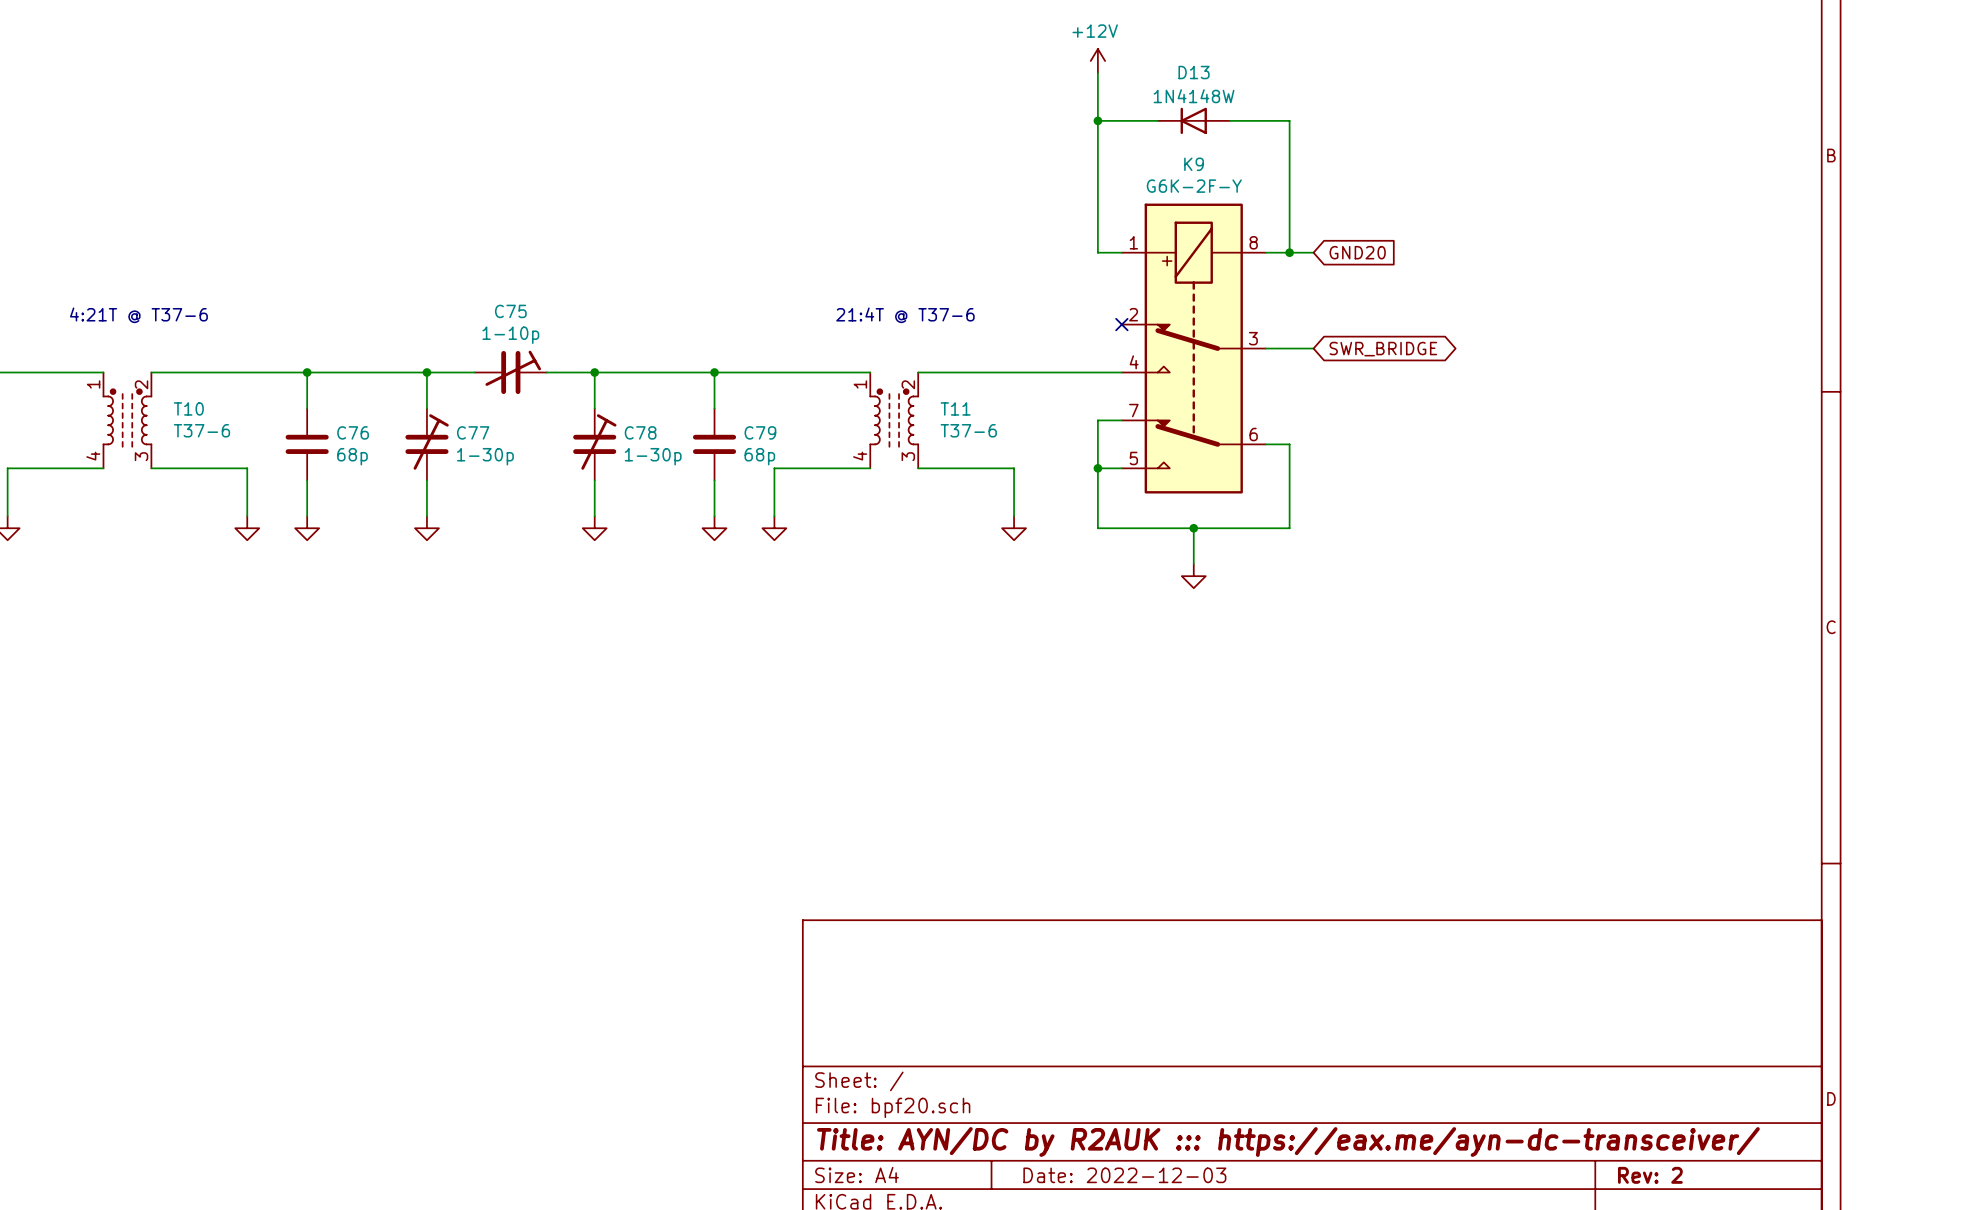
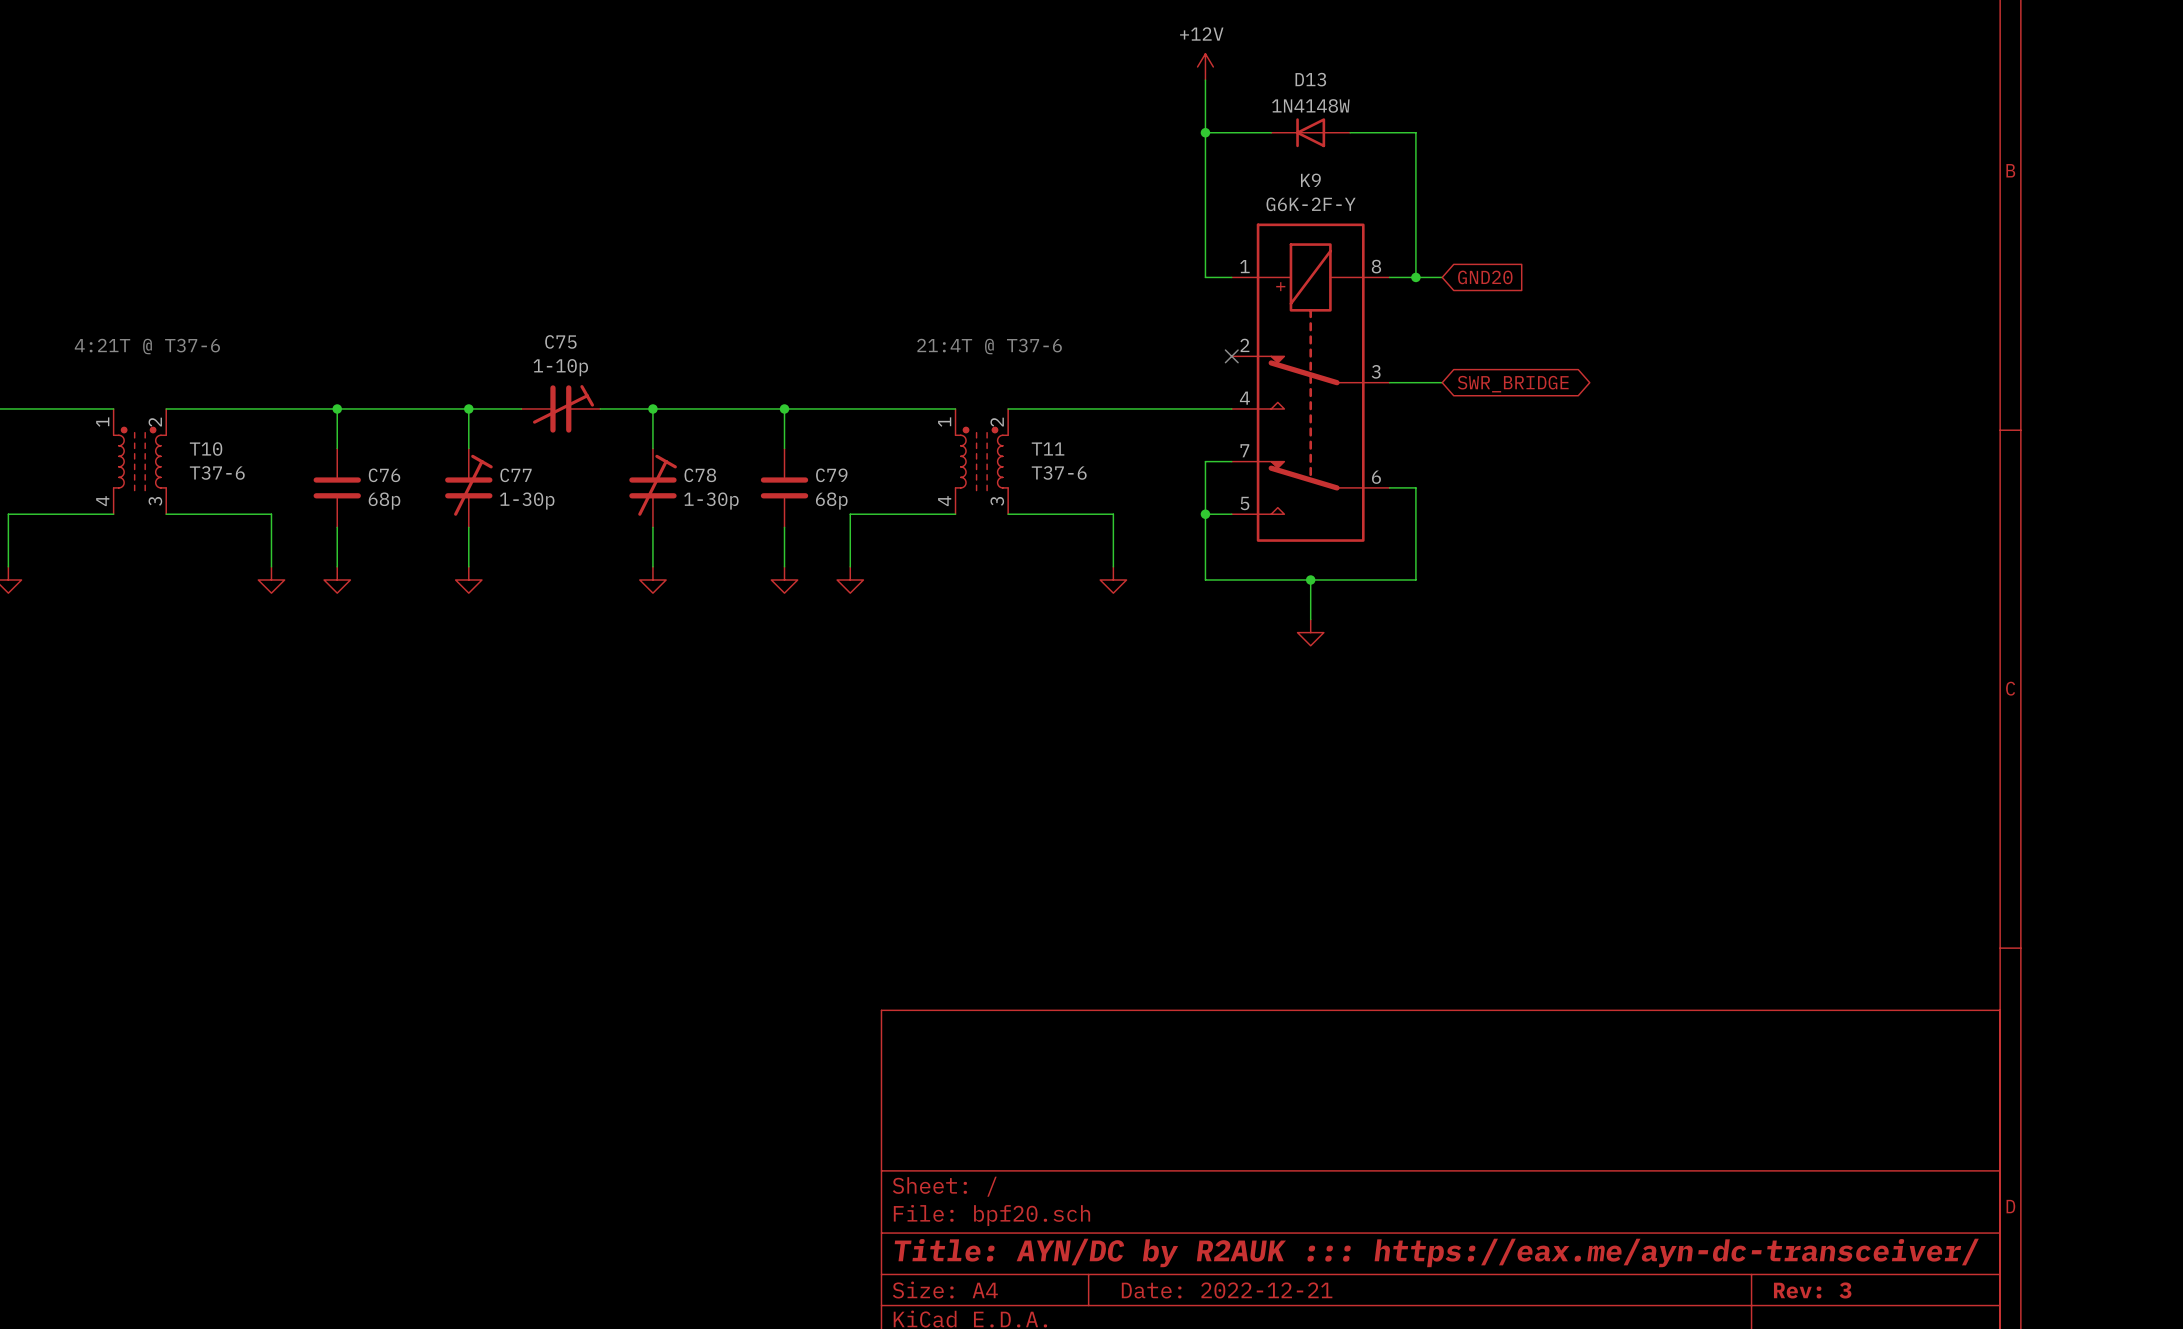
title block: Date: 2022-12-03 (1124, 1175) -> Date: 2022-12-21 (1227, 1290)
title block: Rev: 2 (1650, 1175) -> Rev: 3 (1812, 1290)

